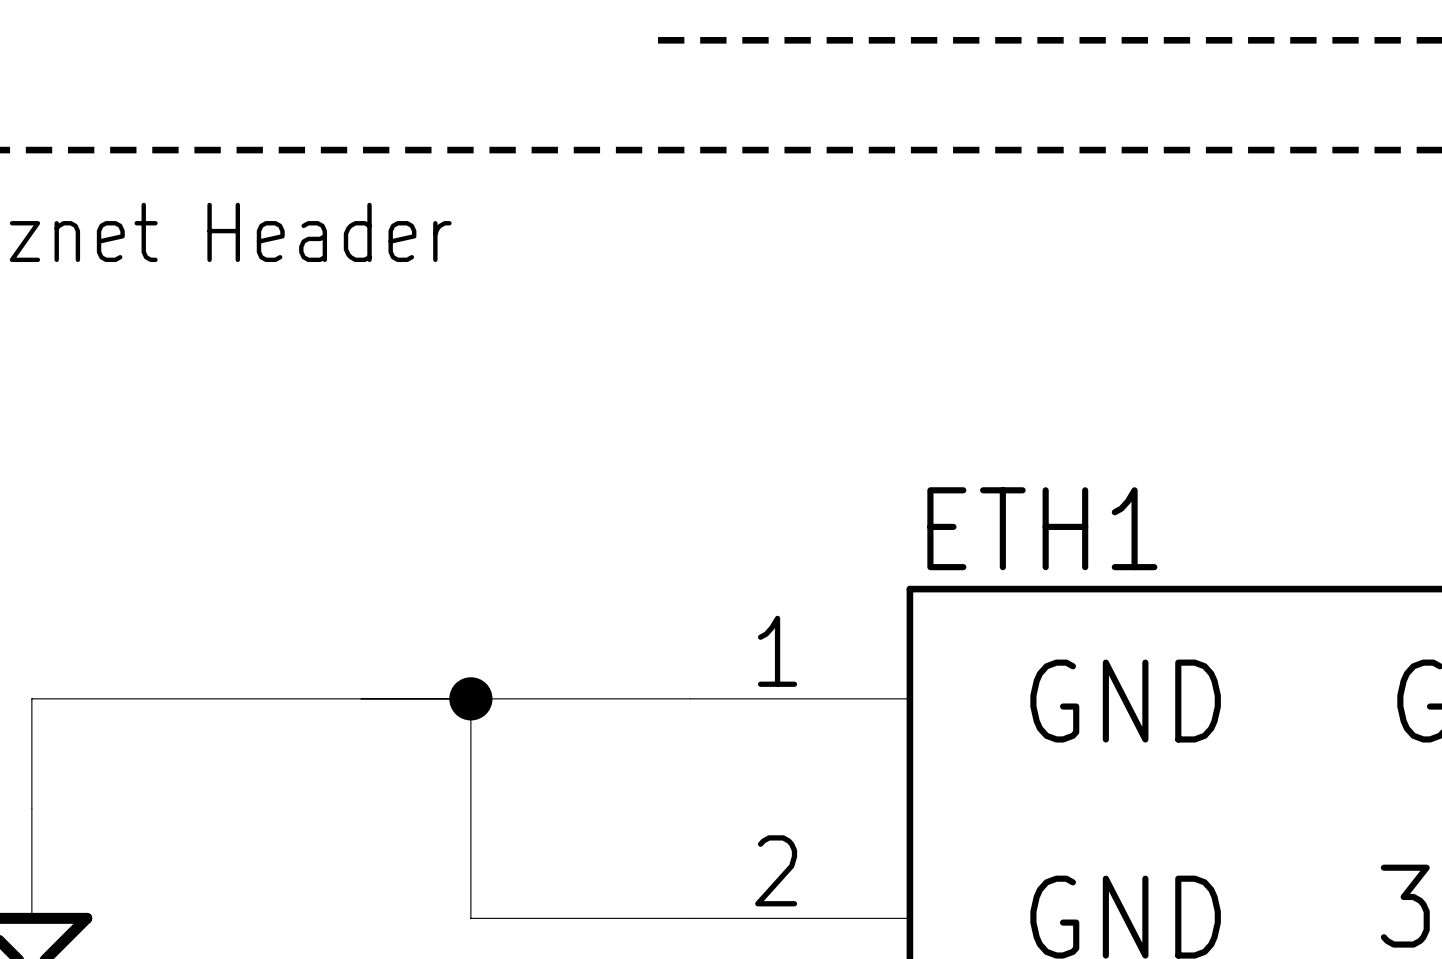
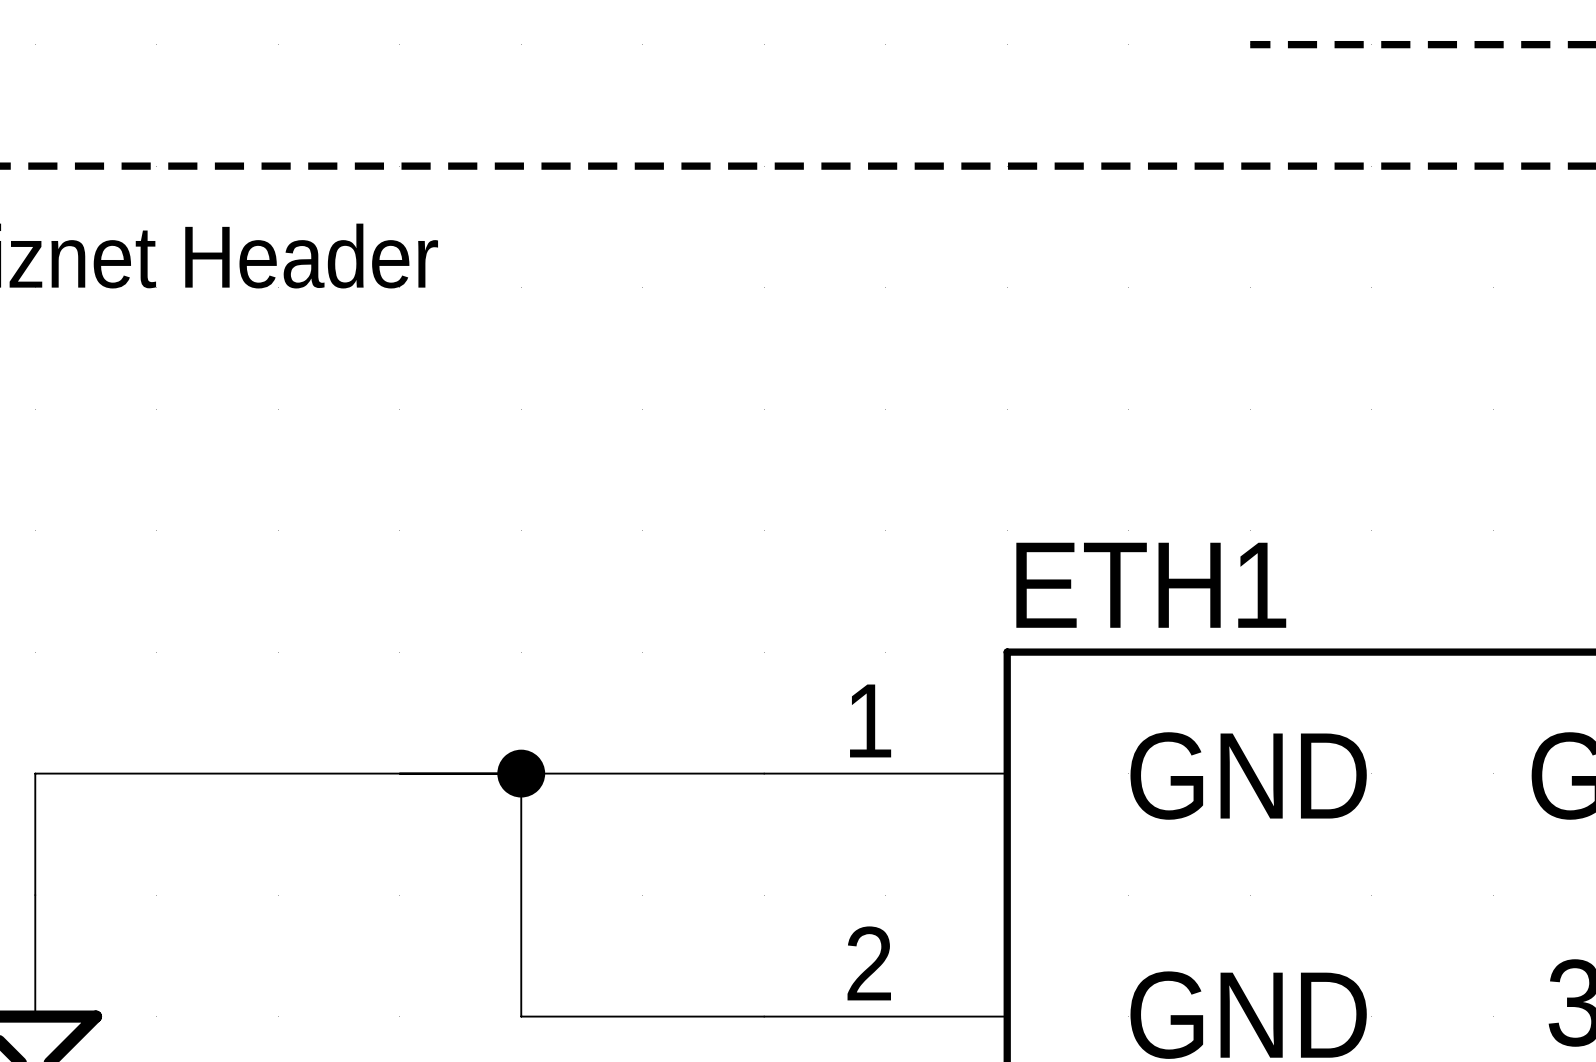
line: (657, 40) (1129, 40) -> none

